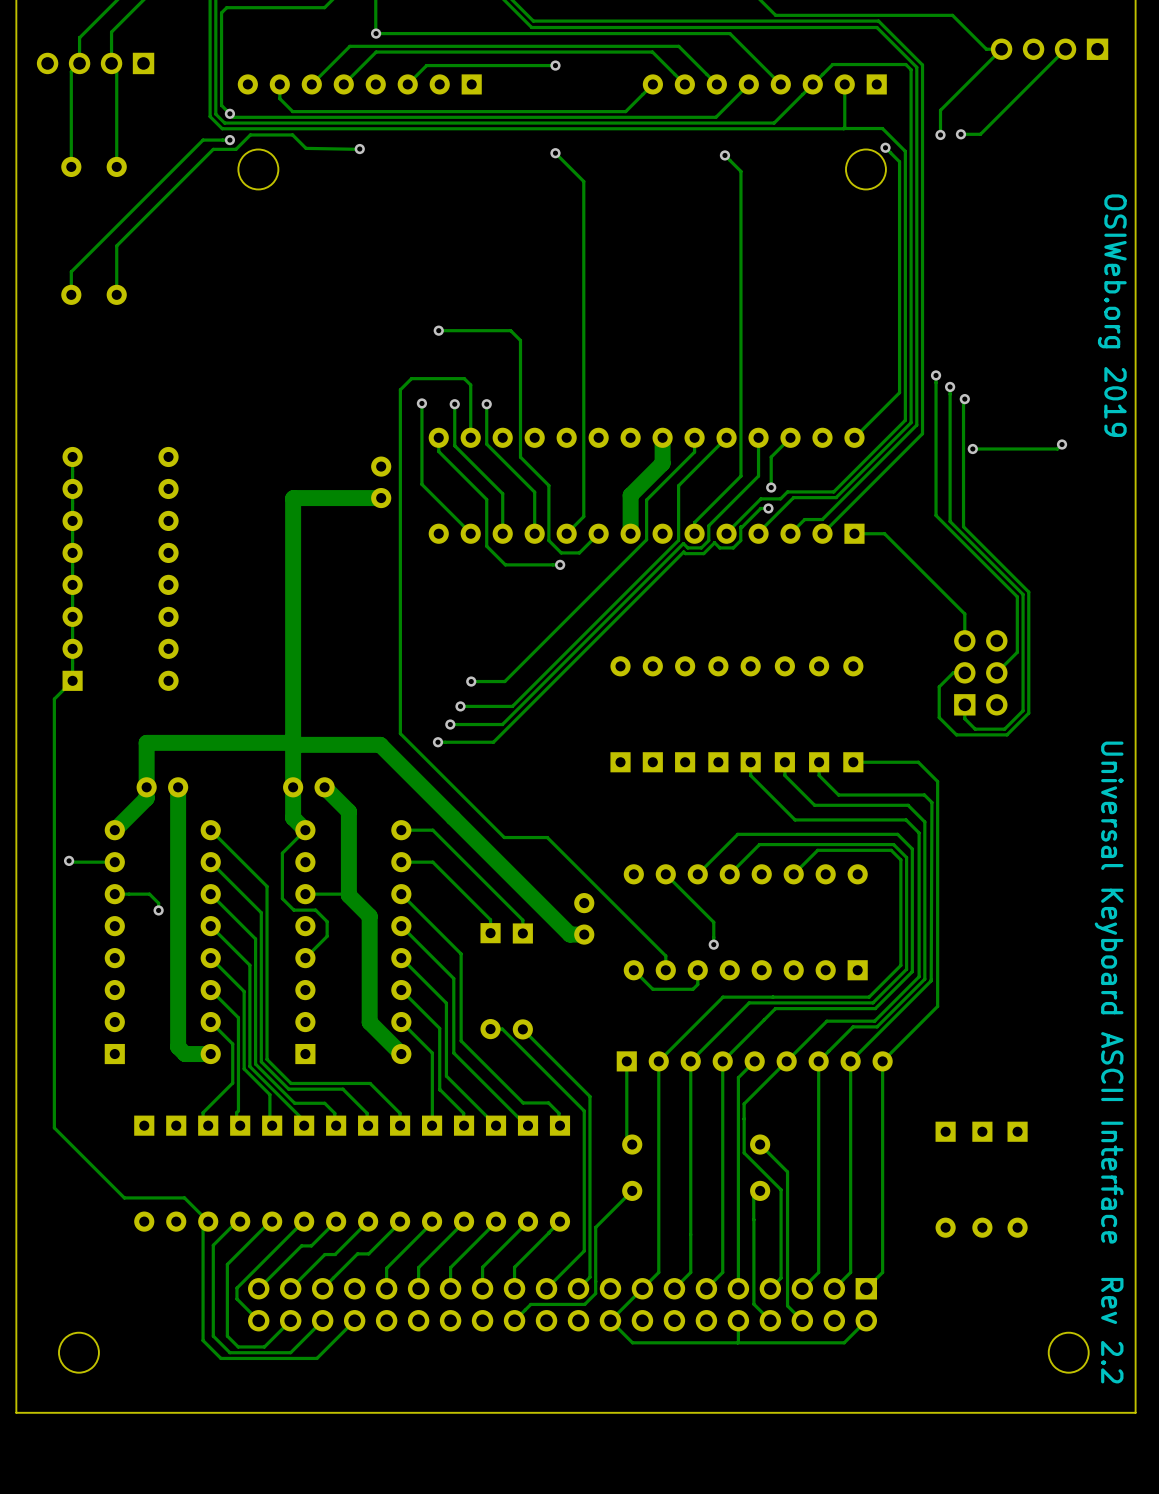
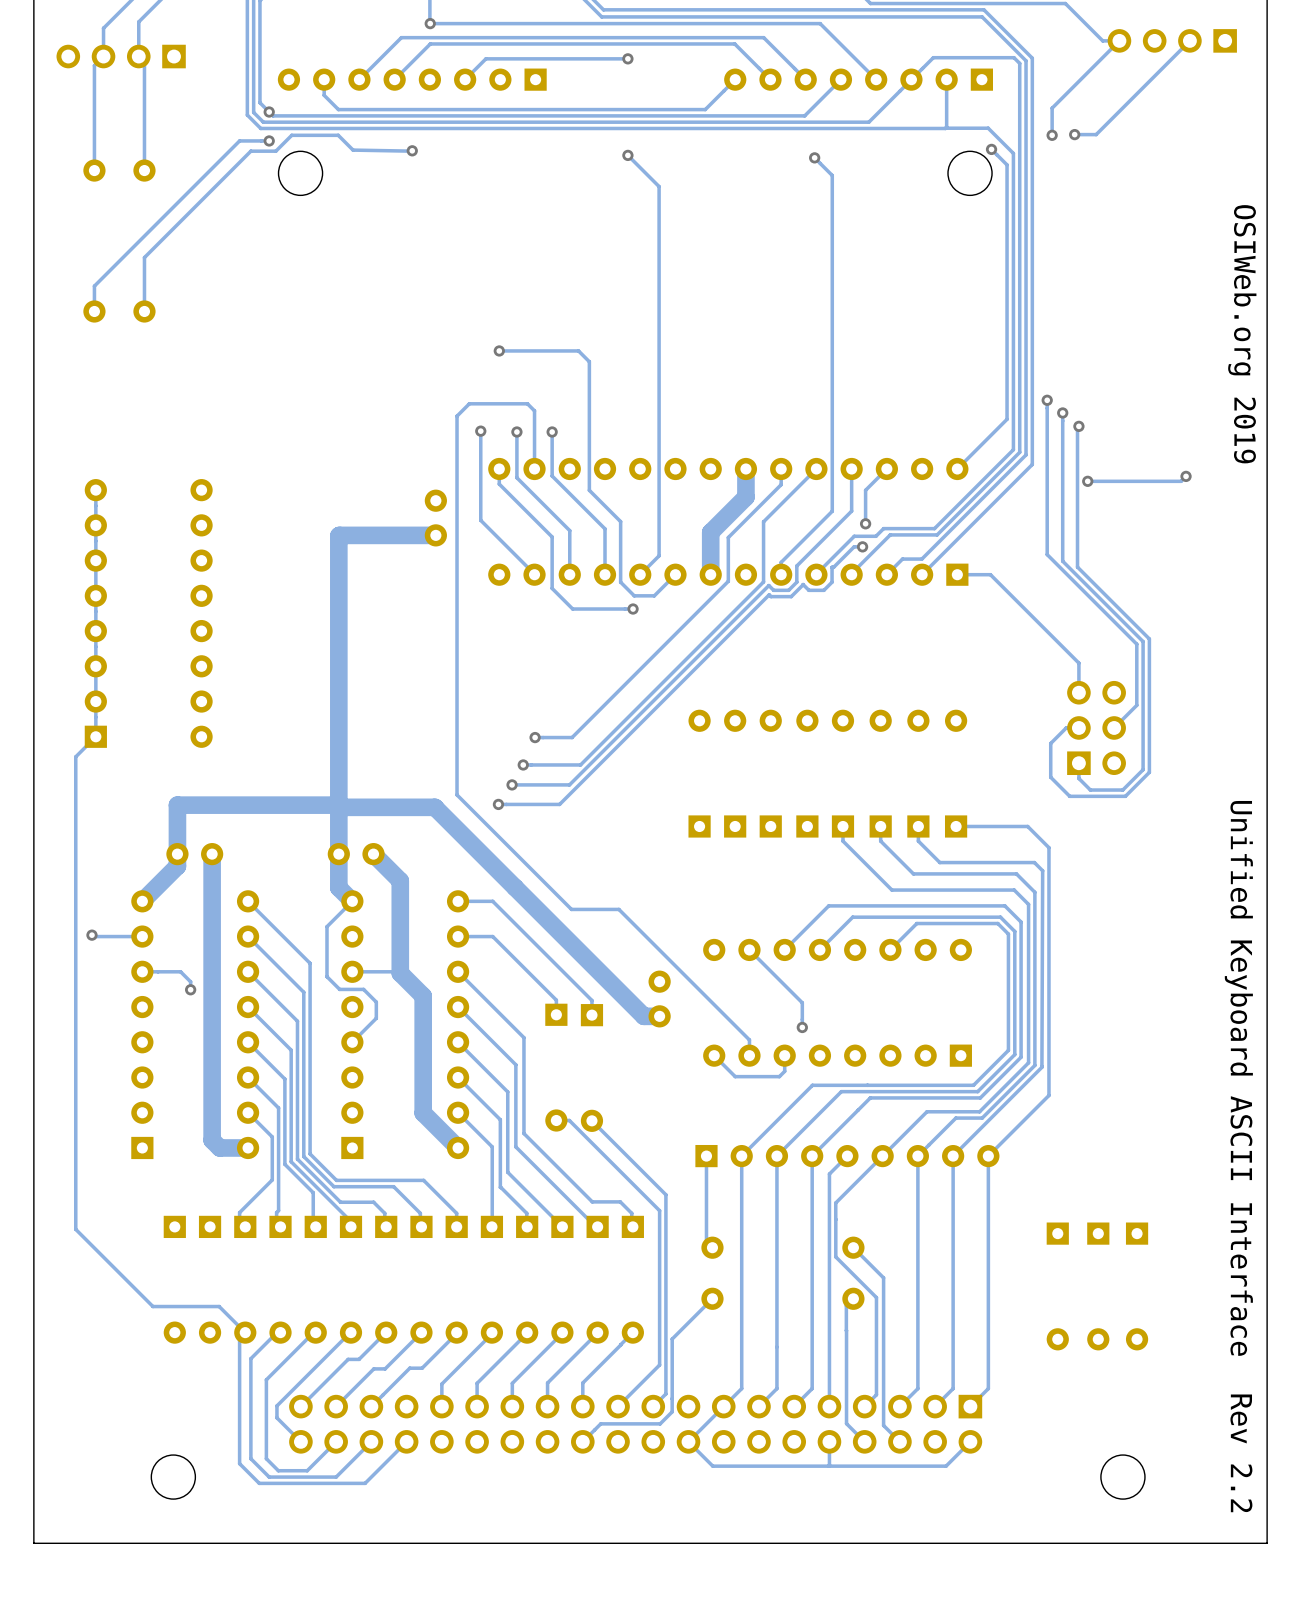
text: Universal Keyboard ASCII Interface Rev 2.2 (1109, 1062) -> Unified Keyboard ASCII Interface Rev 2.2 (1238, 1156)
round board edge position: (78, 1352) -> (173, 1477)
round board edge position: (1068, 1352) -> (1122, 1477)

